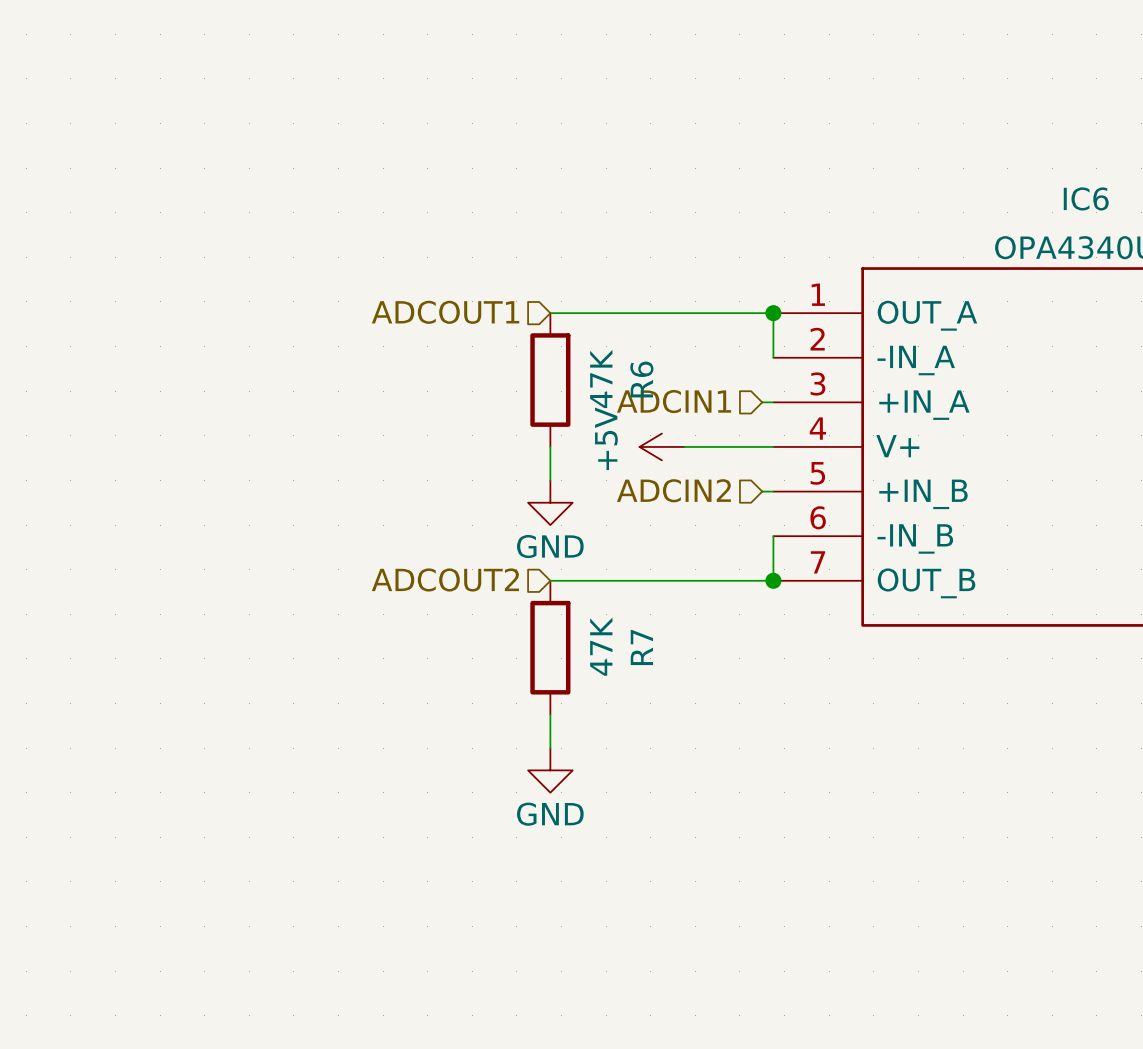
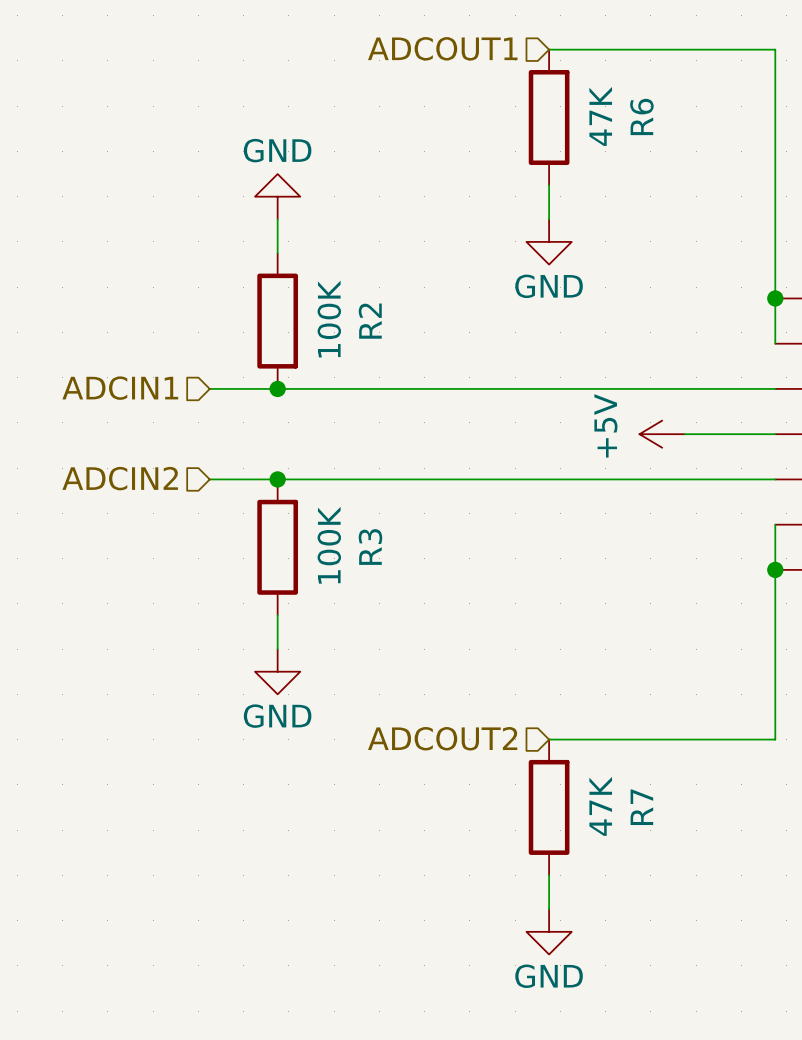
power symbol: none -> GND (277, 196)
wire: none -> (277, 219) (277, 253)
power symbol: none -> GND (549, 241)
hierarchical label position: ADCOUT1 (445, 312) -> ADCOUT1 (442, 48)
wire: (550, 313) (773, 313) -> (549, 49) (775, 49) (775, 298)
R2: none -> 100K (277, 321)
R6 position: (550, 380) -> (549, 117)
hierarchical label: none -> ADCIN1 (120, 388)
hierarchical label: ADCIN1 (674, 401) -> none
wire: none -> (209, 388) (763, 388)
junction: none -> (277, 388)
wire: (550, 446) (550, 480) -> (549, 185) (549, 219)
hierarchical label: none -> ADCIN2 (120, 478)
hierarchical label: ADCIN2 (673, 490) -> none
wire: none -> (209, 479) (763, 479)
junction: none -> (277, 479)
power symbol: GND (550, 502) -> none
R3: none -> 100K (277, 547)
hierarchical label position: ADCOUT2 (445, 579) -> ADCOUT2 (442, 738)
wire: (550, 580) (773, 580) -> (549, 739) (775, 739) (775, 569)
wire: none -> (277, 615) (277, 649)
R7 position: (550, 647) -> (549, 807)
power symbol: none -> GND (277, 671)
wire: (550, 714) (550, 748) -> (549, 875) (549, 909)
power symbol: GND (550, 770) -> none
power symbol: none -> GND (549, 931)

